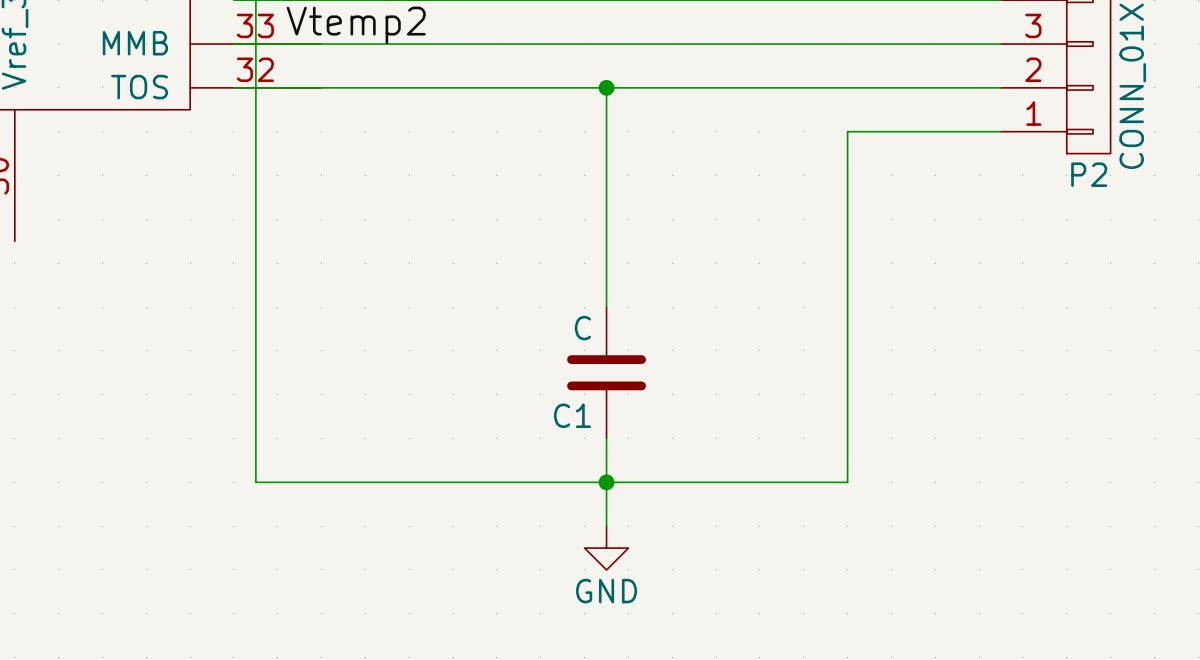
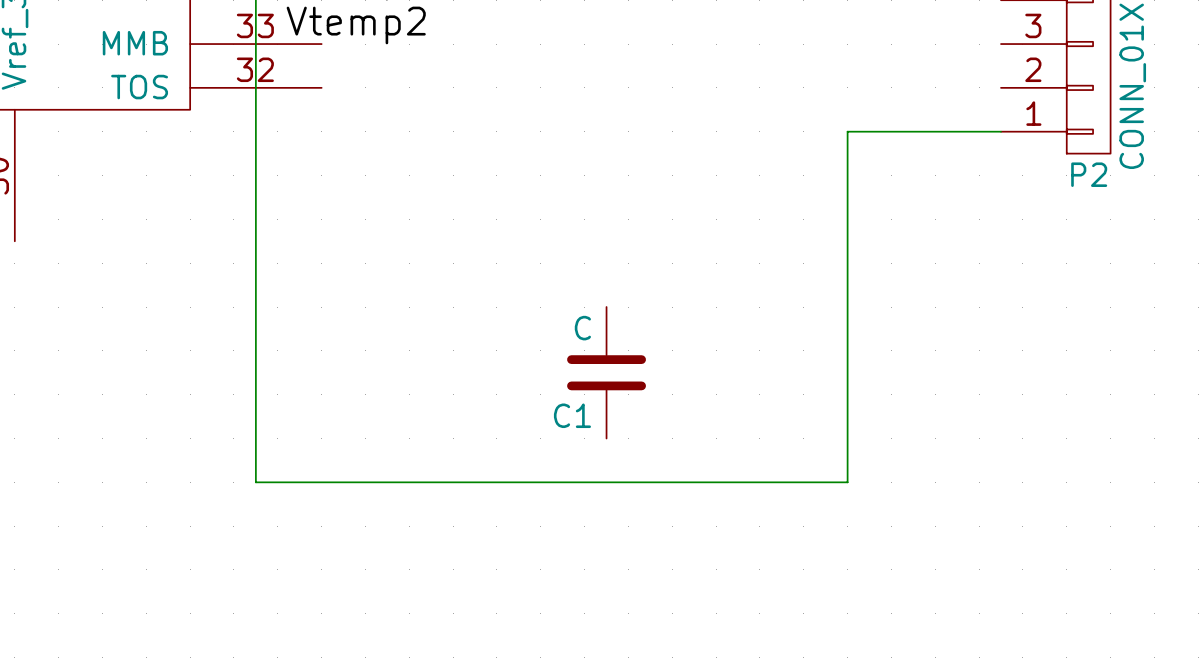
wire: (233, 0) (1001, 0) -> none
wire: (233, 44) (1001, 44) -> none
wire: (233, 87) (1001, 87) -> none
wire: (606, 87) (606, 307) -> none
junction: (606, 87) -> none
wire: (606, 438) (606, 526) -> none
junction: (606, 482) -> none
power symbol: GND (606, 548) -> none

